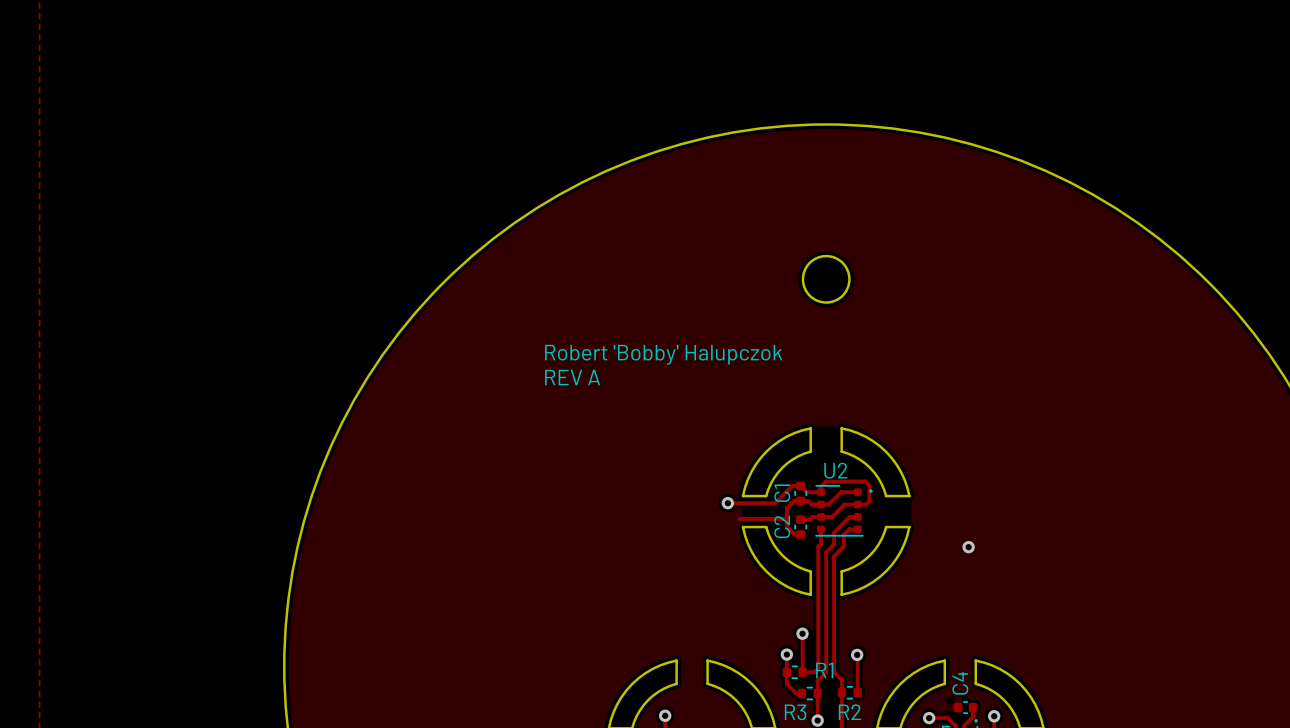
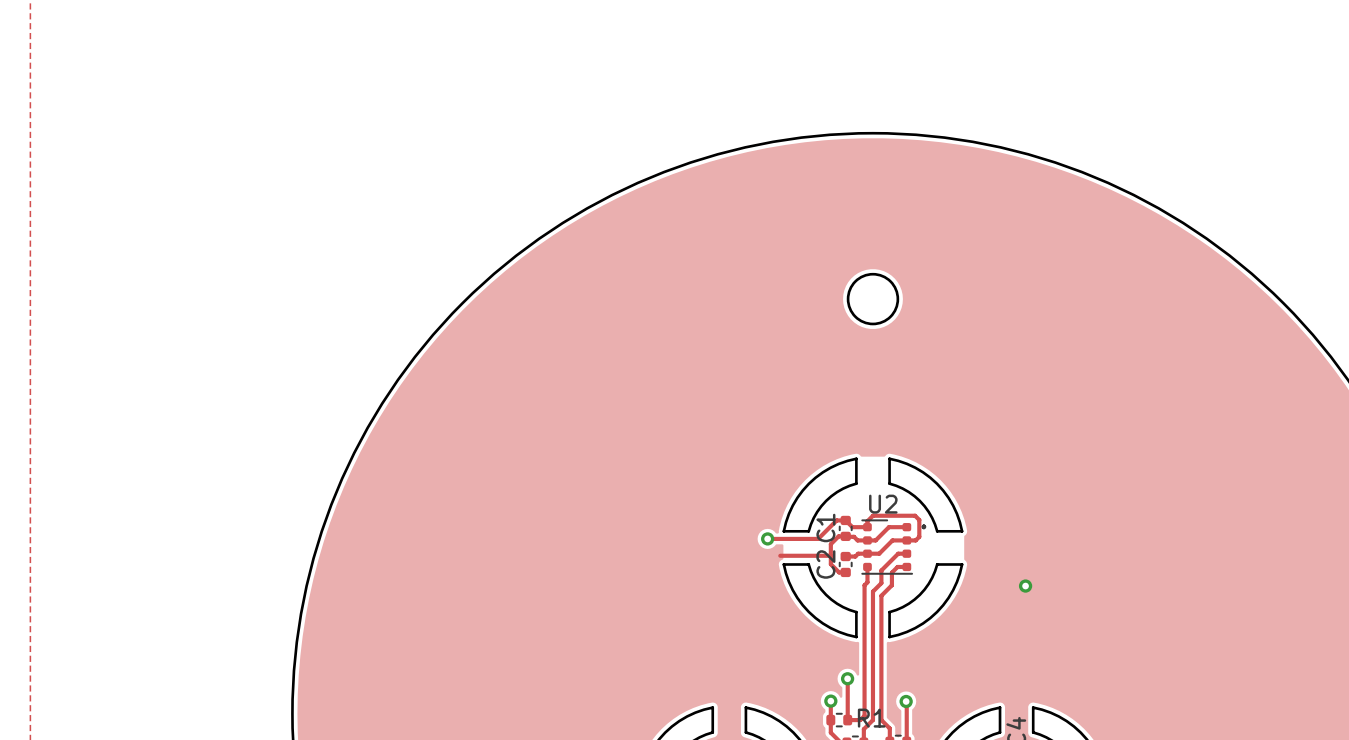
text: Robert 'Bobby' Halupczok (663, 354) -> none
text: REV A (572, 377) -> none

